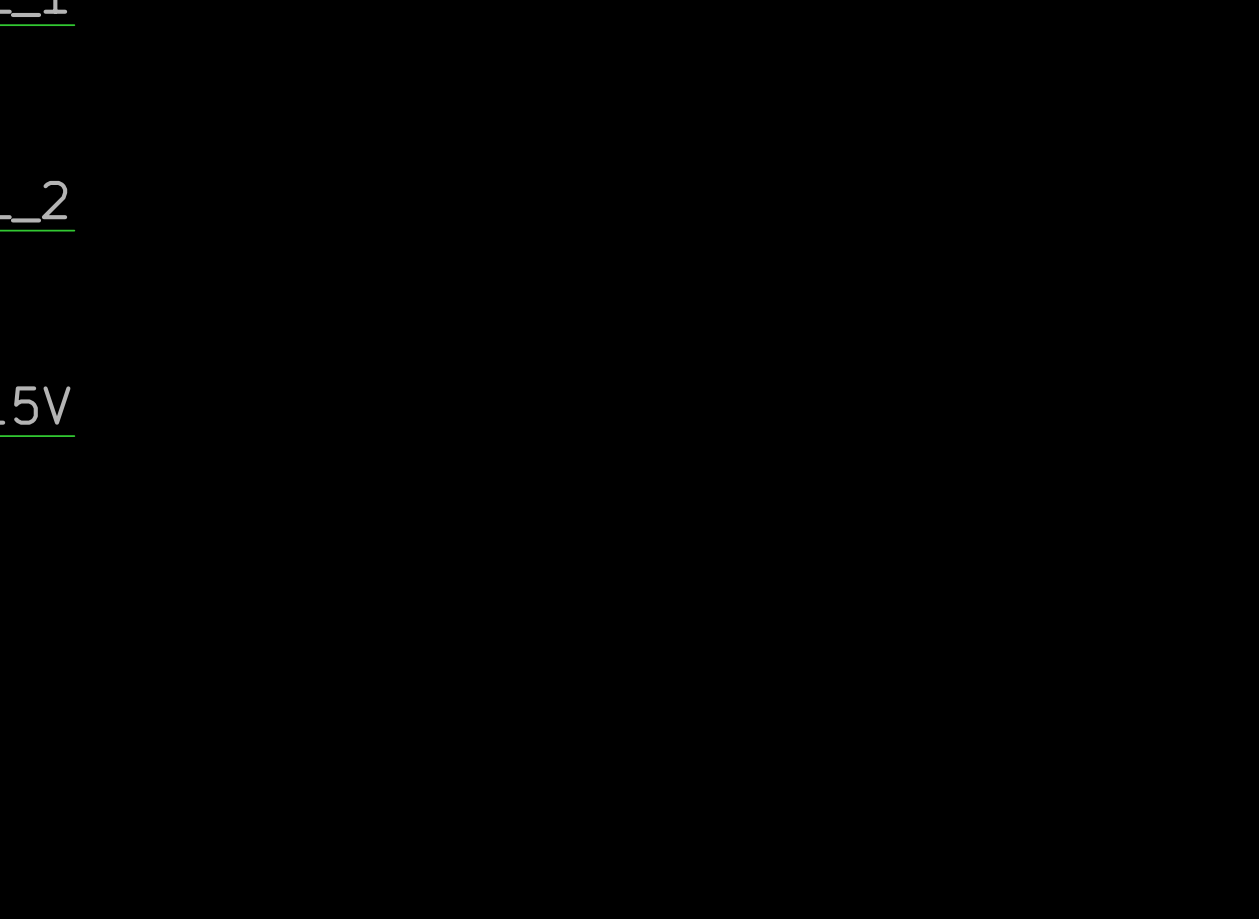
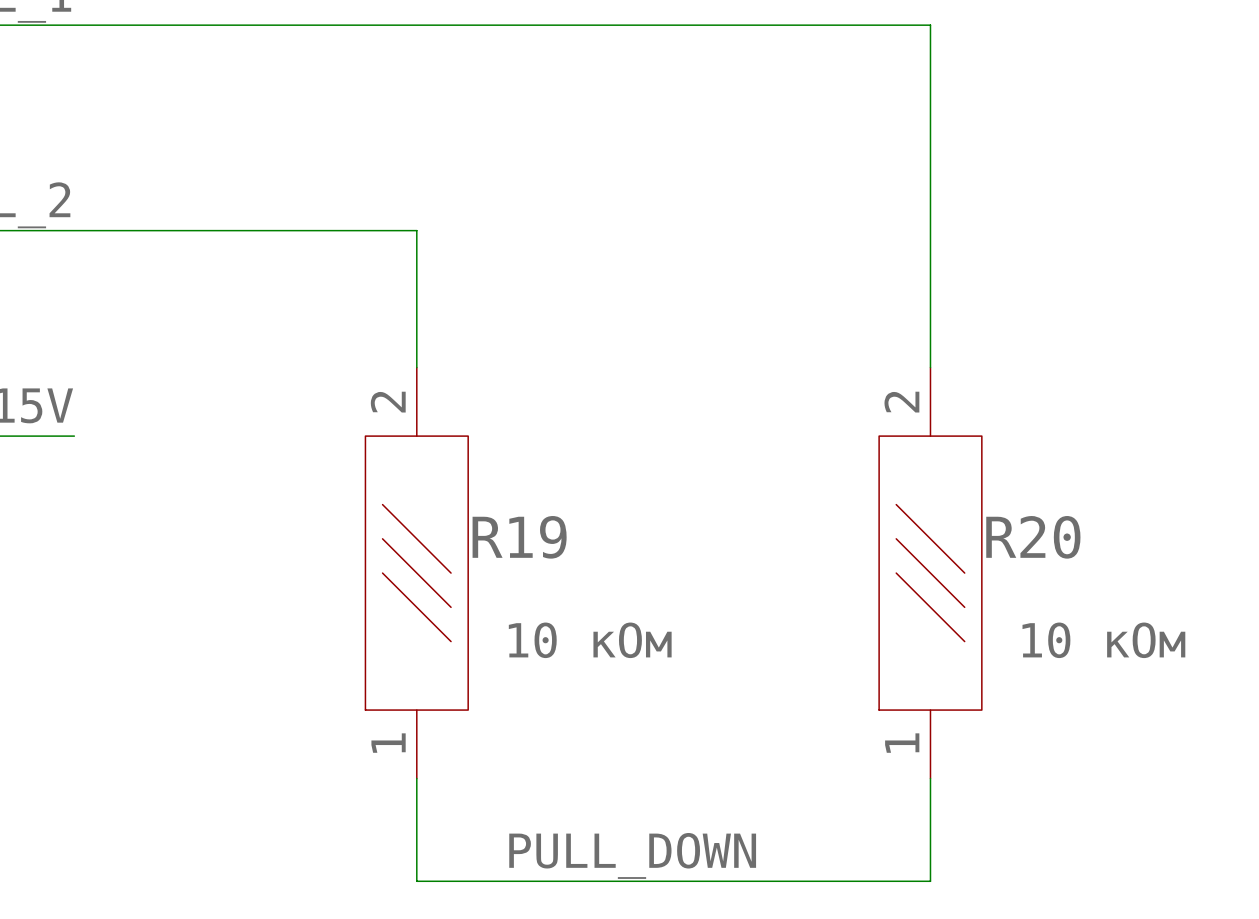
wire: none -> (74, 25) (930, 25) (930, 367)
wire: none -> (74, 230) (416, 230) (416, 367)
R19: none -> (416, 573)
R20: none -> (930, 573)
wire: none -> (416, 778) (416, 881) (930, 881) (930, 778)
label: none -> PULL_DOWN (632, 855)

